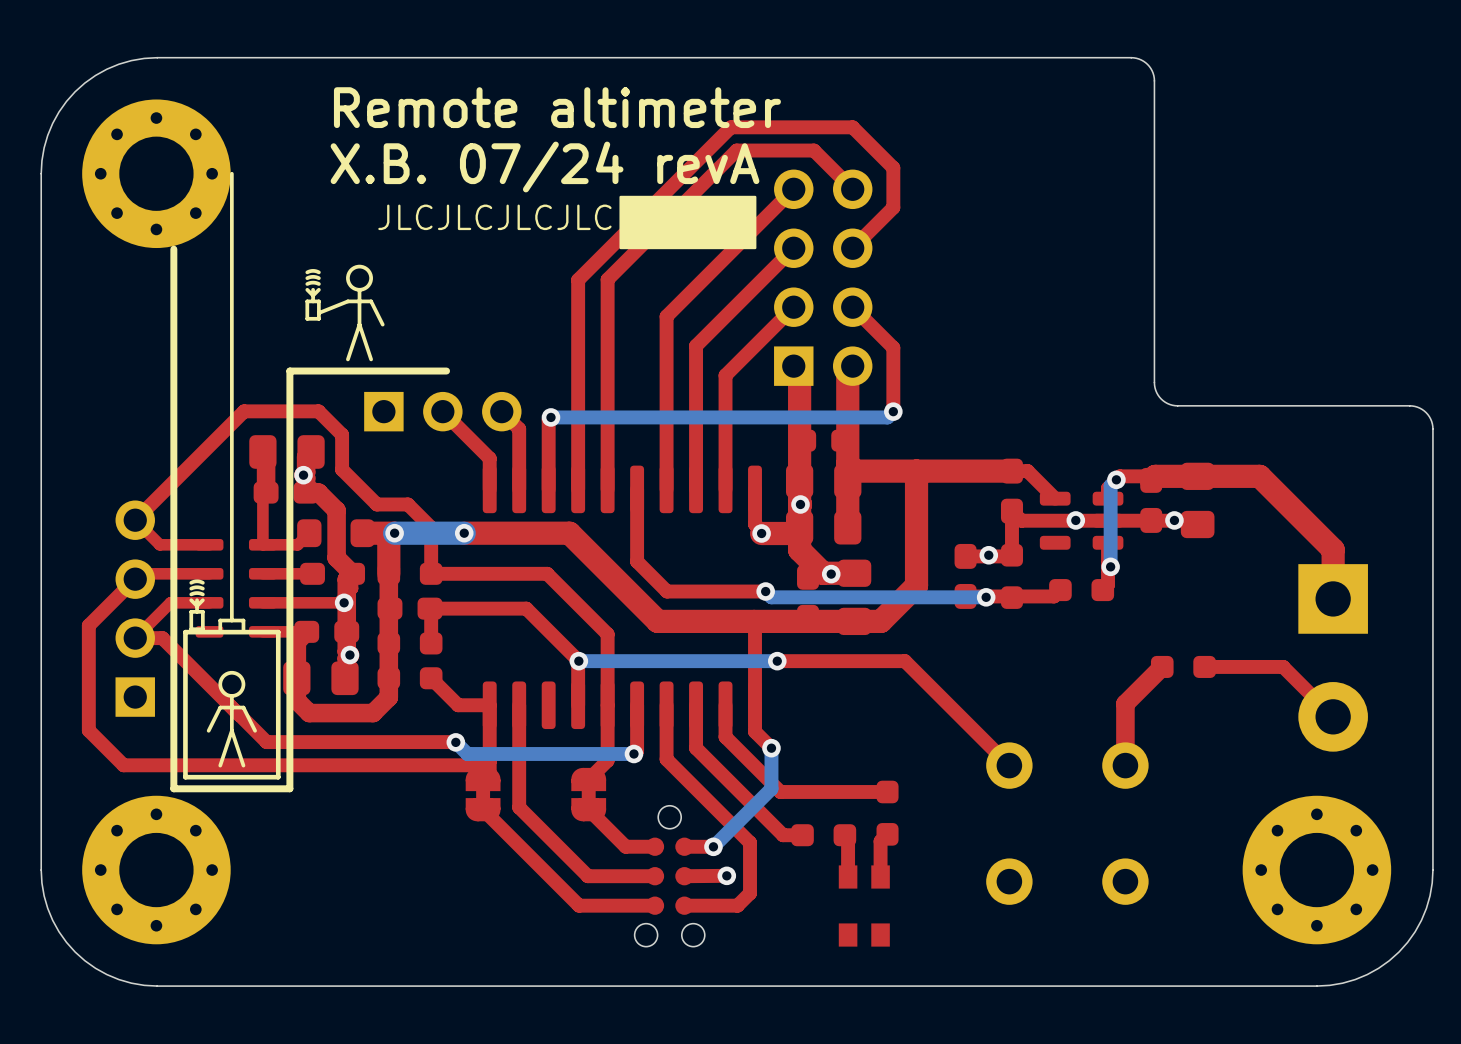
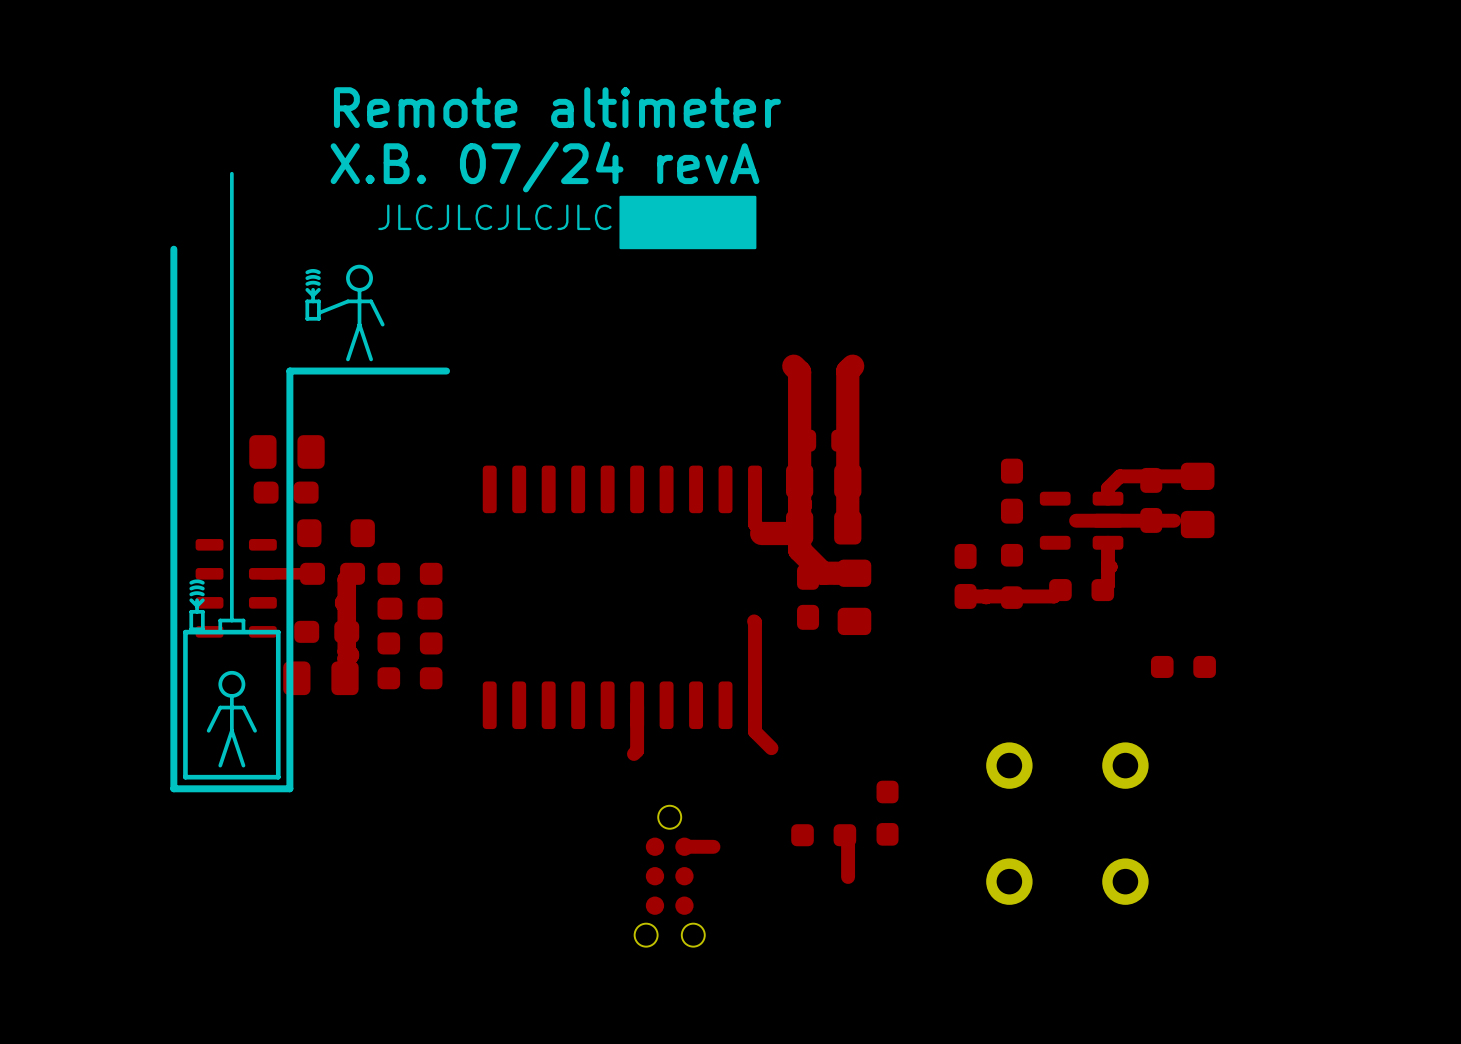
board edge: (1131, 57) (157, 57) (118, 64) (84, 83) (66, 101) (52, 123) (44, 147) (41, 173) (41, 870) (47, 908) (66, 942) (84, 960) (106, 974) (131, 983) (157, 986) (1316, 986) (1355, 979) (1389, 960) (1415, 931) (1426, 908) (1432, 883) (1432, 423) (1426, 412) (1412, 405) (1177, 405) (1167, 403) (1159, 397) (1154, 382) (1154, 78) (1147, 64) (1141, 60) (1131, 57) -> none
part: (156, 173) -> none
top track: (793, 189) (666, 316) (666, 489) -> none
top track: (852, 189) (813, 150) (736, 150) (607, 279) (607, 489) -> none
top track: (793, 248) (696, 345) (696, 489) -> none
top track: (852, 248) (893, 207) (893, 167) (852, 127) (730, 127) (578, 280) (578, 489) -> none
part: (823, 277) -> none
top track: (793, 307) (725, 375) (725, 489) -> none
top track: (852, 307) (893, 347) (893, 411) -> none
top track: (442, 411) (489, 458) (489, 489) -> none
part: (442, 411) -> none
top track: (501, 411) (519, 429) (519, 489) -> none
bottom track: (893, 411) (887, 417) (550, 417) -> none
via: (893, 411) -> none
top track: (550, 417) (548, 419) (548, 489) -> none
via: (550, 417) -> none
top track: (262, 451) (266, 455) (266, 492) (262, 495) (262, 544) (297, 544) (309, 533) -> none
top track: (311, 451) (306, 456) (306, 472) (303, 475) (306, 477) (306, 492) (318, 492) (336, 510) (336, 557) (352, 573) (352, 588) (338, 602) (262, 602) -> none
top track: (847, 463) (855, 471) (1027, 471) (1055, 498) -> none
top track: (916, 471) (916, 585) (880, 621) (657, 621) (569, 533) (464, 533) -> none
via: (303, 475) -> none
bottom track: (1116, 479) (1110, 485) (1110, 566) -> none
via: (1116, 479) -> none
top track: (1151, 480) (1155, 476) (1259, 476) (1333, 549) (1333, 598) -> none
top track: (637, 489) (637, 561) (667, 591) (765, 591) -> none
via: (800, 504) -> none
top track: (1075, 520) (1021, 520) (1011, 511) (1010, 556) (965, 556) -> none
via: (1075, 520) -> none
via: (1174, 520) -> none
top track: (362, 533) (394, 533) (388, 539) (388, 697) (373, 713) (309, 713) (296, 700) (296, 641) (306, 631) (262, 631) -> none
via: (394, 533) -> none
bottom track: (464, 533) (394, 533) -> none
via: (464, 533) -> none
via: (761, 533) -> none
top track: (209, 544) (159, 544) (135, 520) (244, 411) (318, 411) (342, 434) (342, 469) (376, 504) (407, 504) (431, 527) (431, 573) (547, 573) (607, 634) (607, 760) (588, 779) -> none
via: (988, 555) -> none
via: (1110, 566) -> none
top track: (209, 573) (140, 573) (88, 625) (88, 730) (123, 765) (485, 765) (489, 760) -> none
via: (831, 574) -> none
bottom track: (765, 591) (771, 597) (986, 597) -> none
via: (765, 591) -> none
via: (986, 597) -> none
top track: (209, 602) (170, 602) (135, 638) (162, 638) (239, 714) -> none
via: (344, 602) -> none
part: (135, 608) -> none
top track: (431, 643) (430, 608) (526, 608) (578, 661) (578, 705) -> none
via: (349, 655) -> none
part: (1333, 657) -> none
via: (578, 661) -> none
top track: (777, 661) (904, 661) (1009, 765) -> none
bottom track: (777, 661) (578, 661) -> none
via: (777, 661) -> none
top track: (1162, 666) (1125, 703) (1125, 765) -> none
top track: (1204, 666) (1283, 666) (1333, 716) -> none
top track: (431, 678) (458, 705) (489, 705) (489, 772) (483, 779) -> none
top track: (519, 705) (519, 807) (587, 876) (654, 876) -> none
top track: (666, 705) (666, 759) (750, 842) (750, 893) (737, 905) (684, 905) -> none
top track: (696, 705) (696, 748) (783, 835) (802, 835) -> none
top track: (725, 705) (725, 737) (780, 791) (887, 791) -> none
top track: (235, 710) (266, 742) (455, 742) -> none
bottom track: (455, 742) (467, 753) (633, 753) -> none
via: (455, 742) -> none
bottom track: (771, 748) (771, 788) (713, 846) -> none
via: (771, 748) -> none
via: (633, 753) -> none
part: (483, 794) -> none
part: (588, 794) -> none
top track: (483, 809) (579, 905) (654, 905) -> none
top track: (588, 809) (625, 846) (654, 846) -> none
top track: (887, 834) (880, 841) (880, 876) -> none
via: (713, 846) -> none
part: (156, 870) -> none
part: (1316, 870) -> none
via: (726, 875) -> none
top track: (726, 876) (684, 876) -> none
part: (864, 906) -> none

